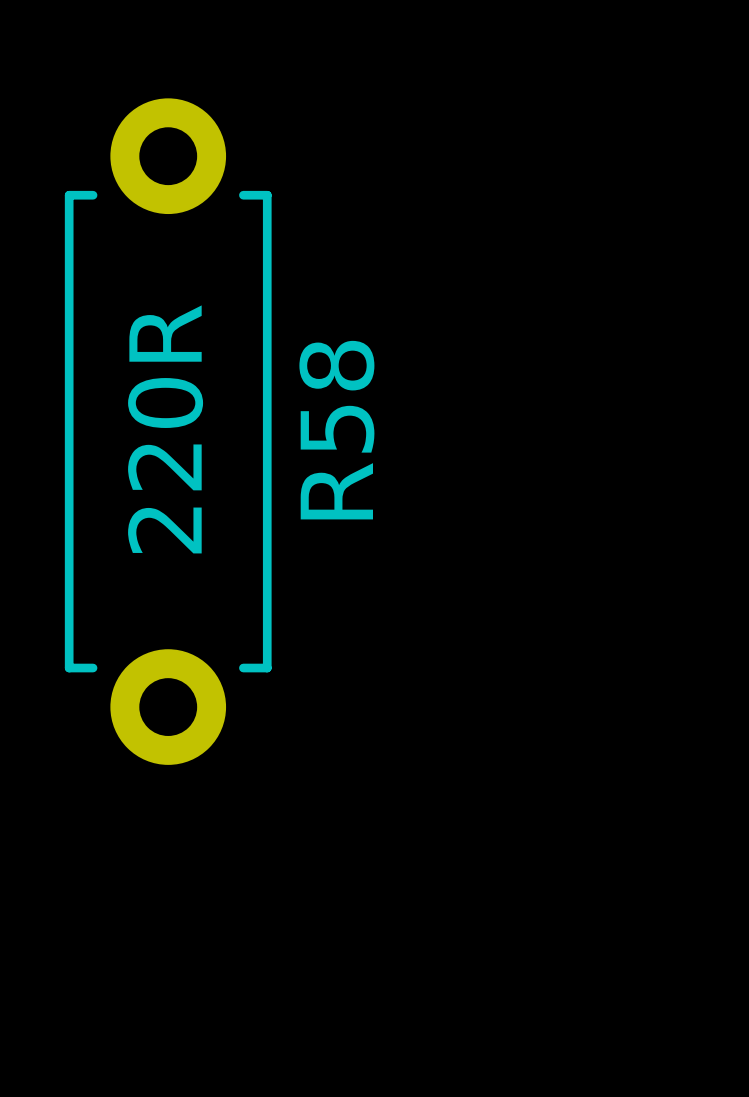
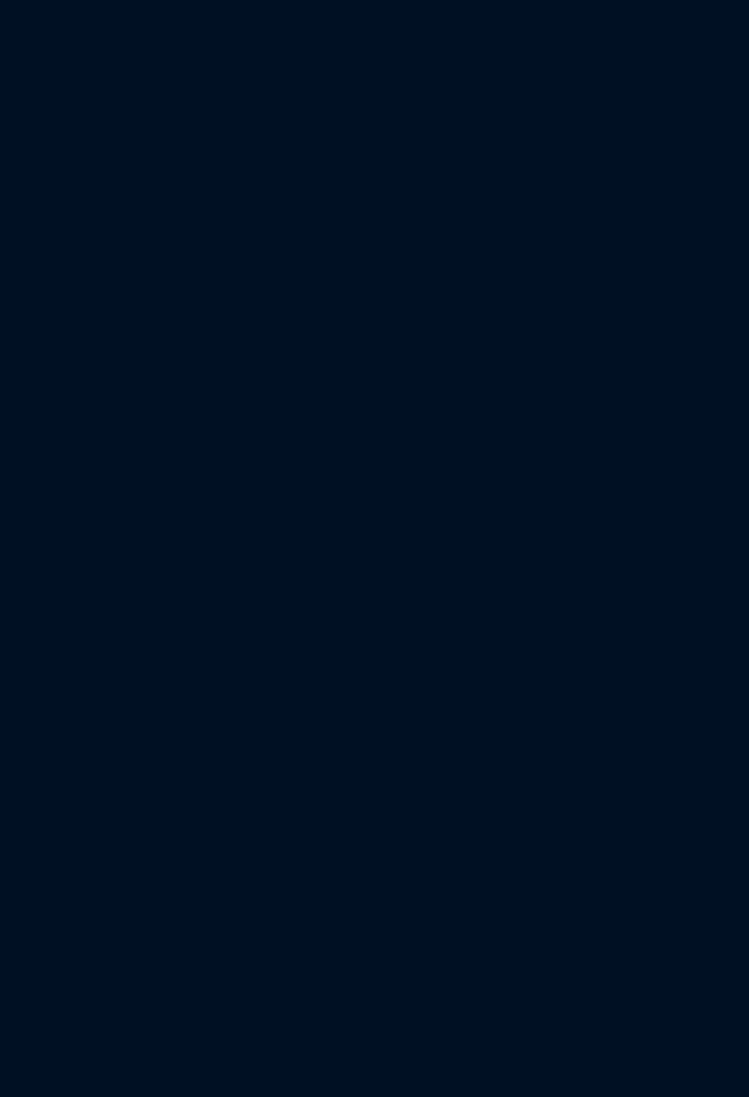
R58: 220R (168, 431) -> none

